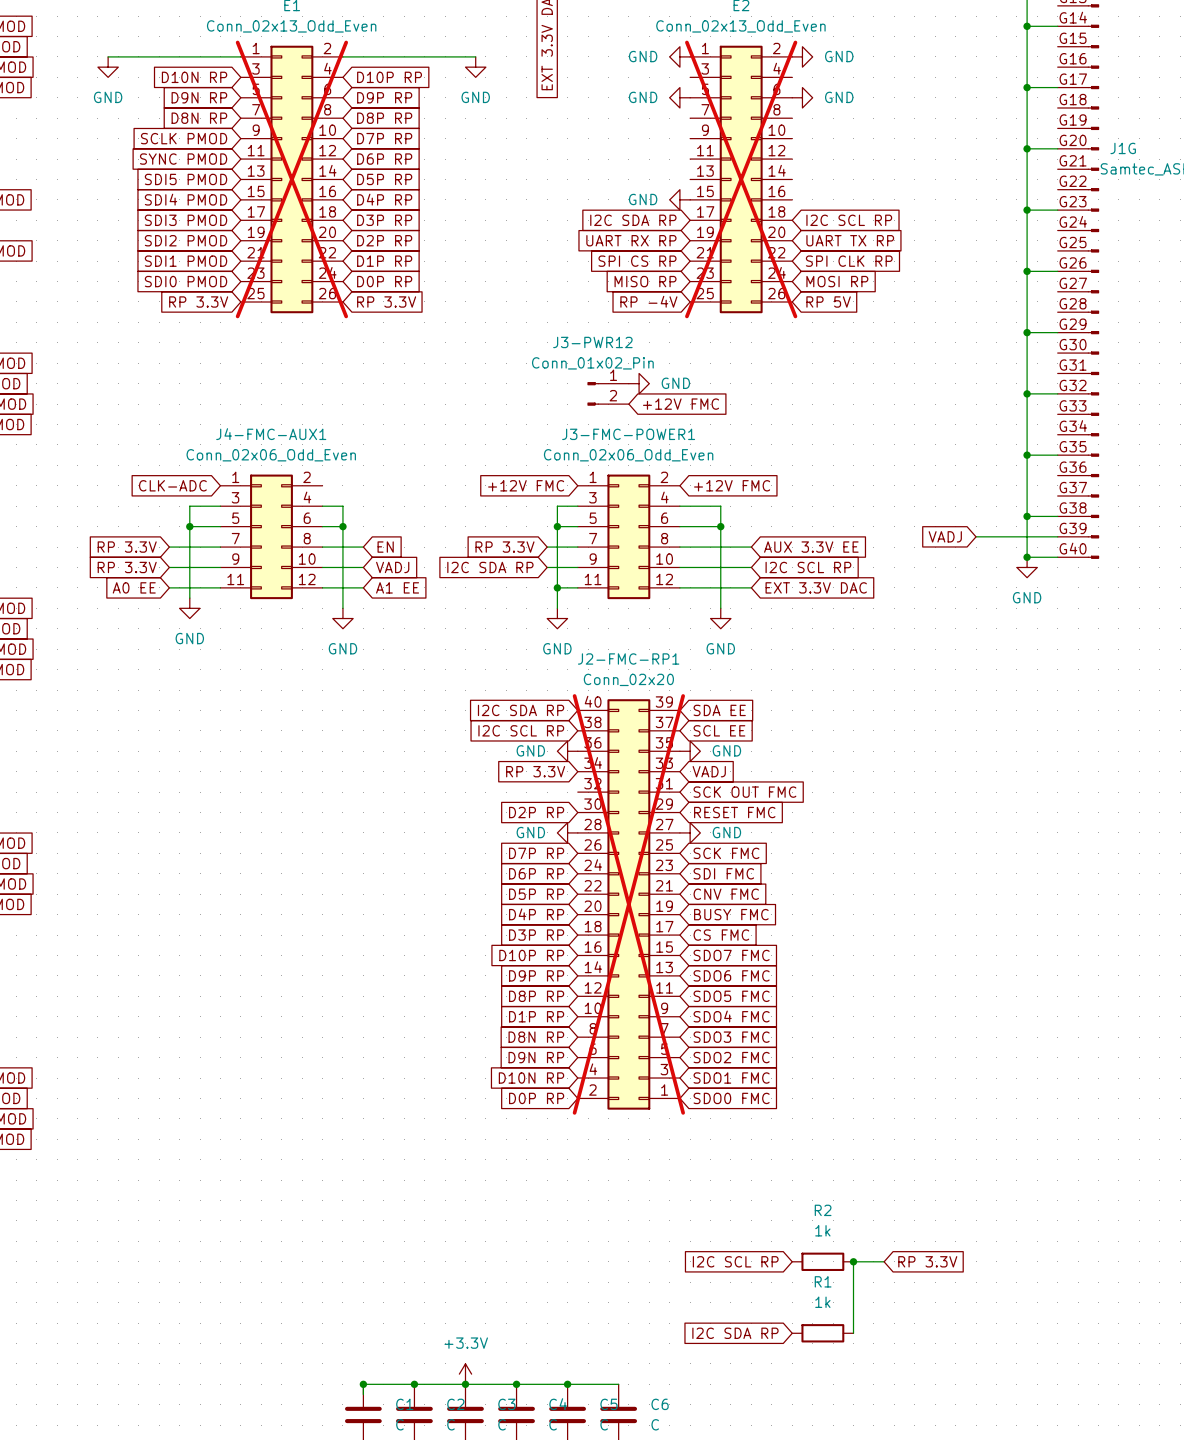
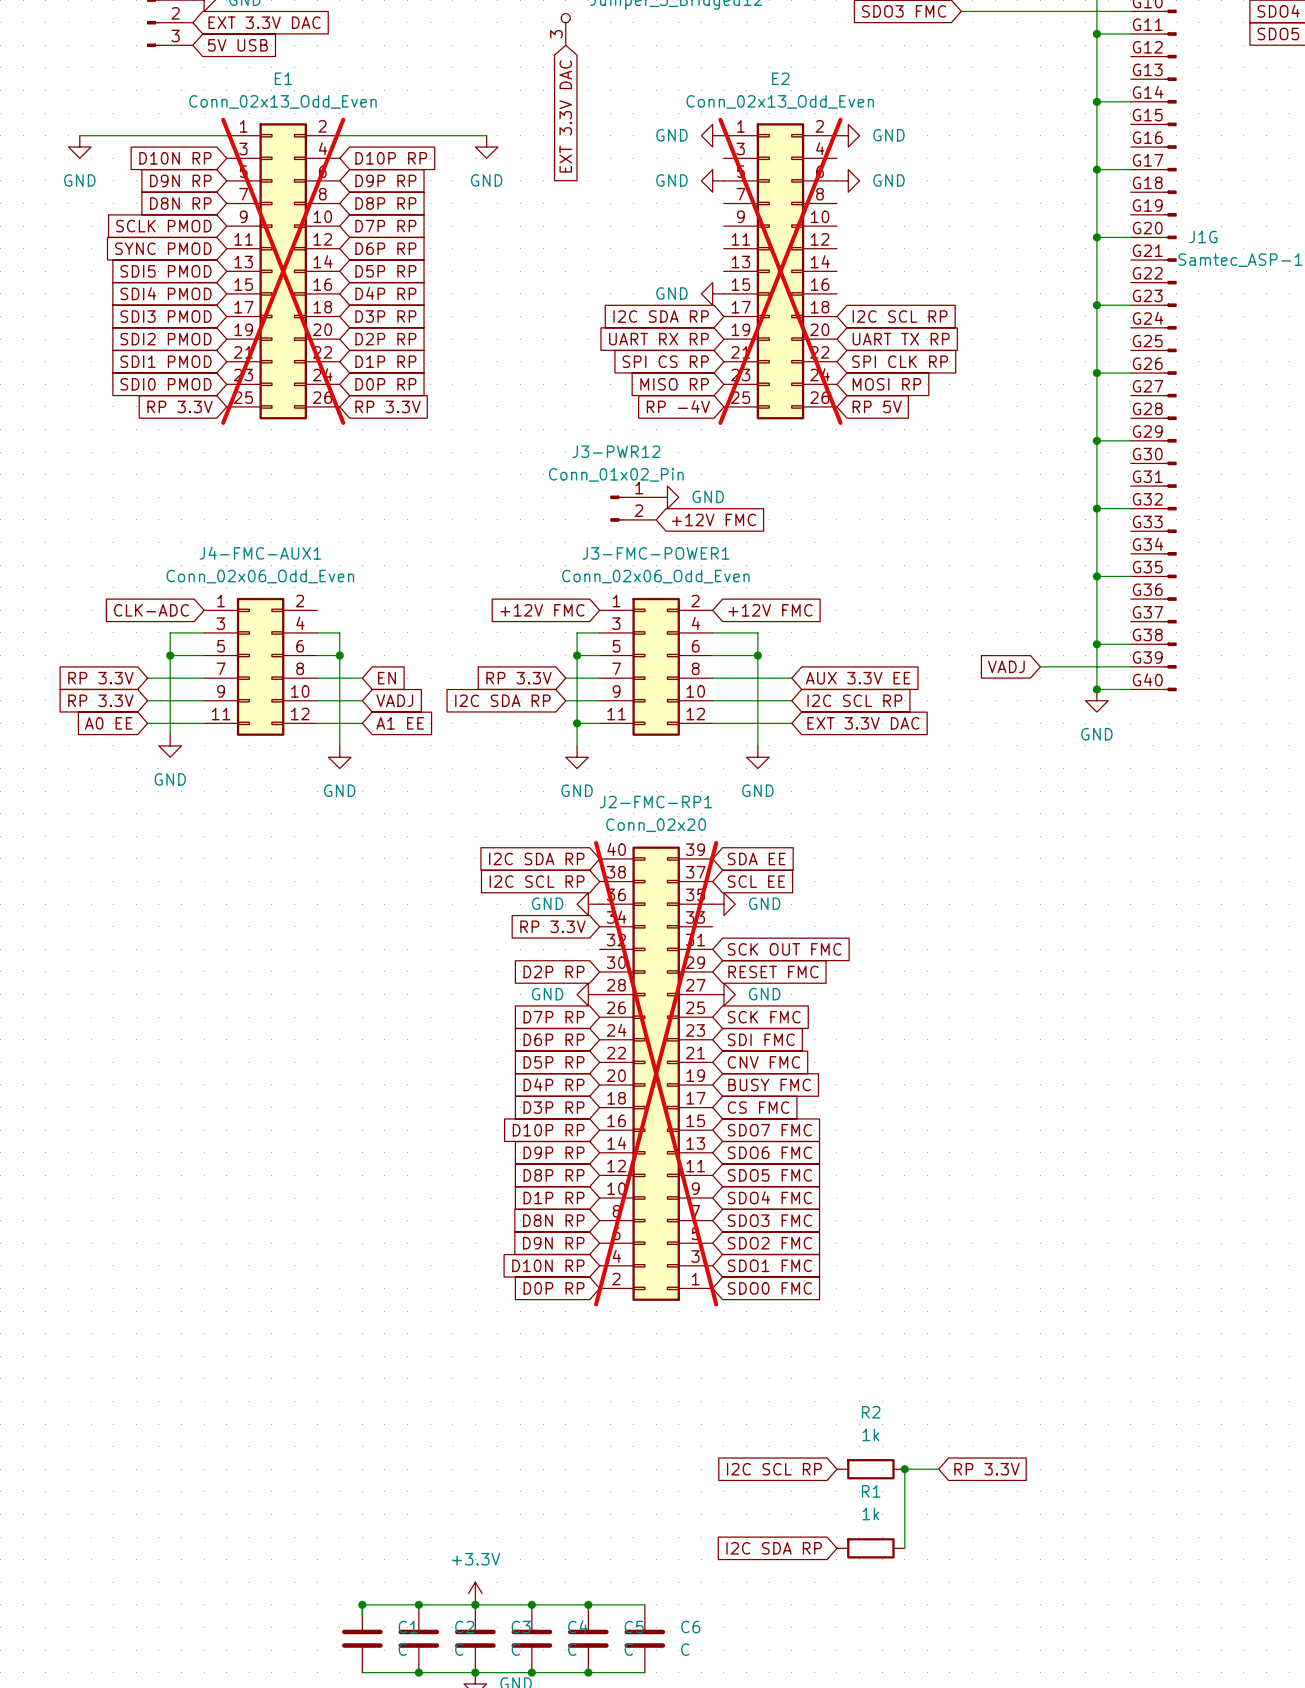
global label: VADJ (709, 771) -> none

